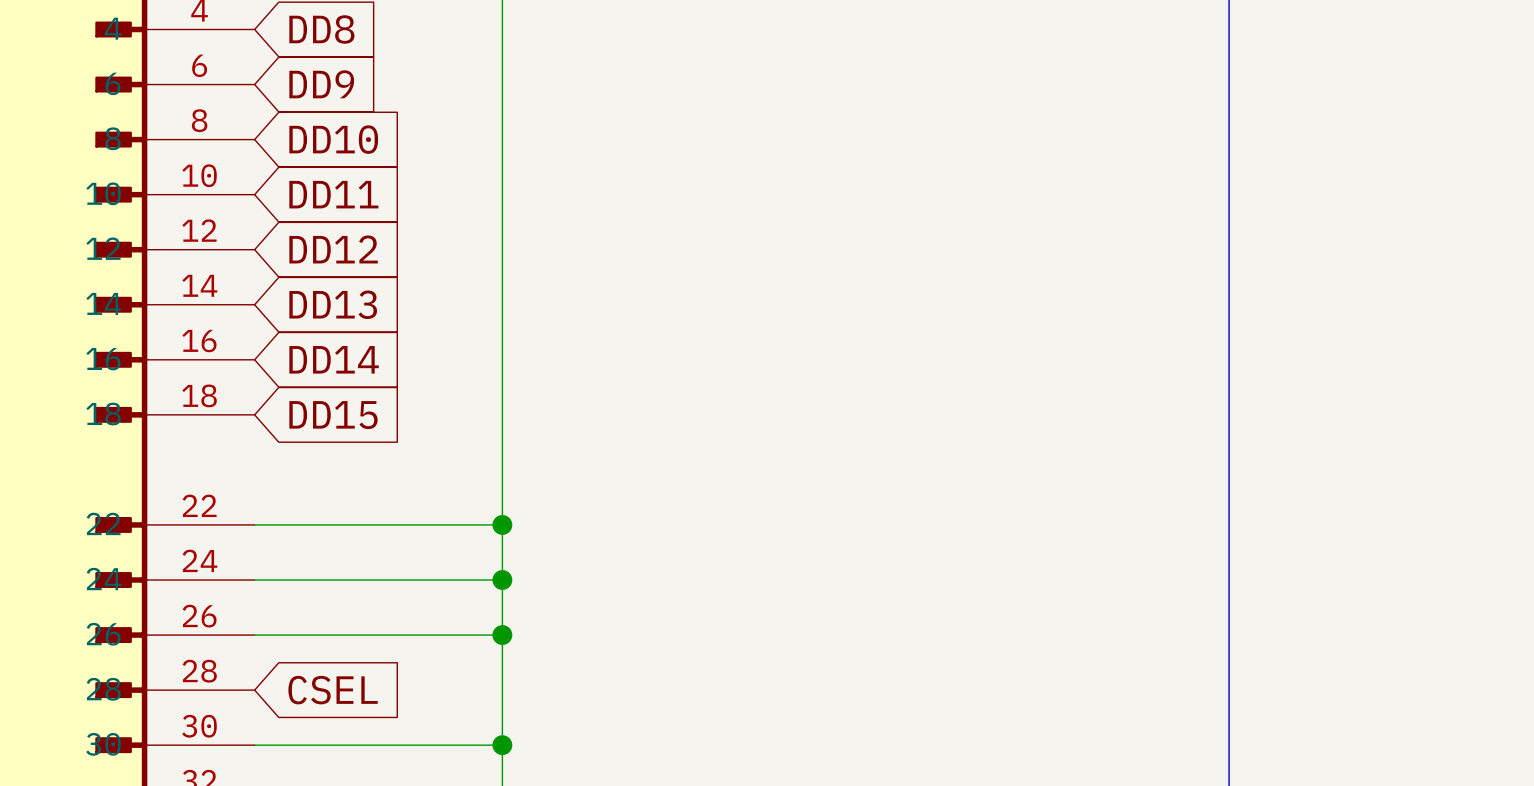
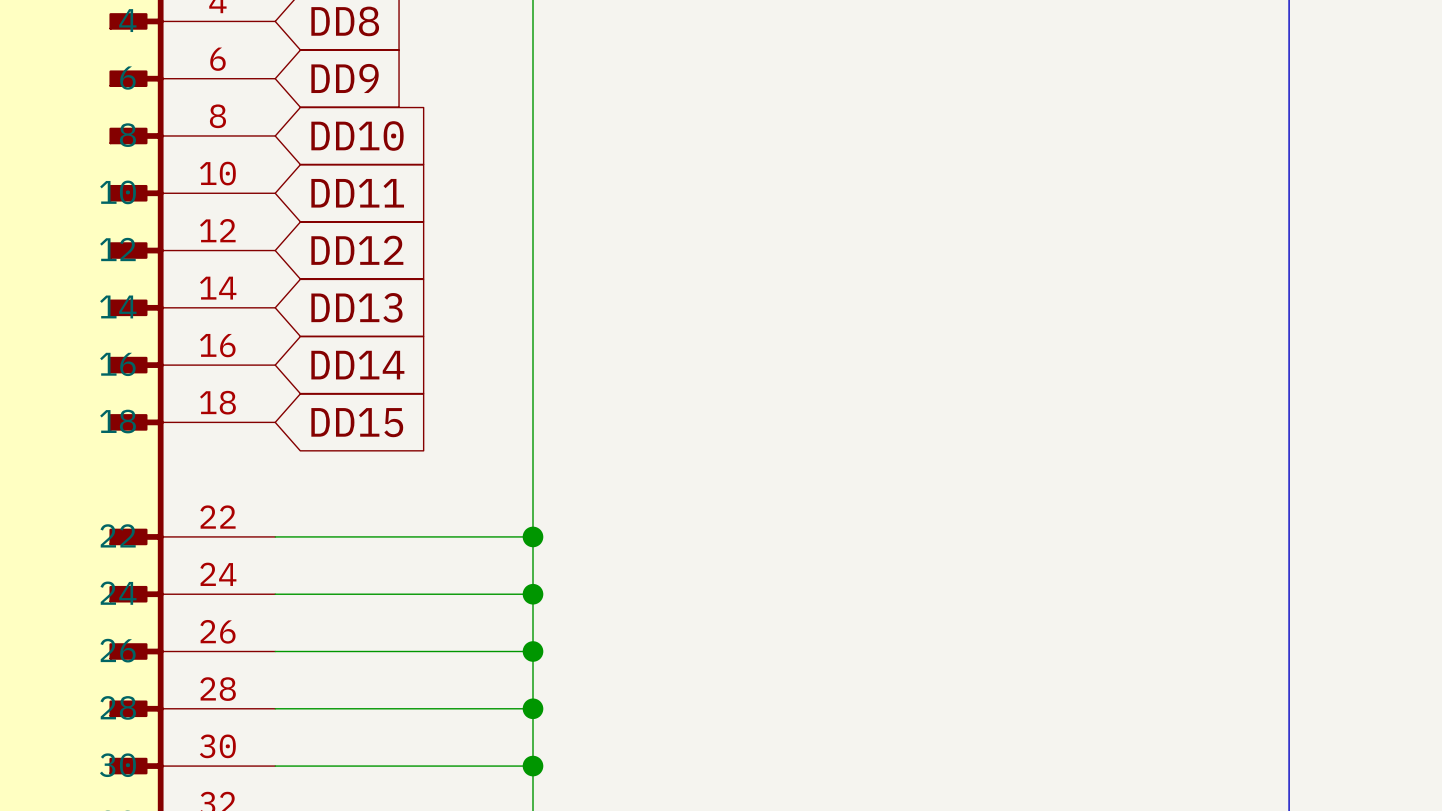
wire: none -> (275, 708) (533, 708)
global label: CSEL (333, 690) -> none
junction: none -> (533, 708)

